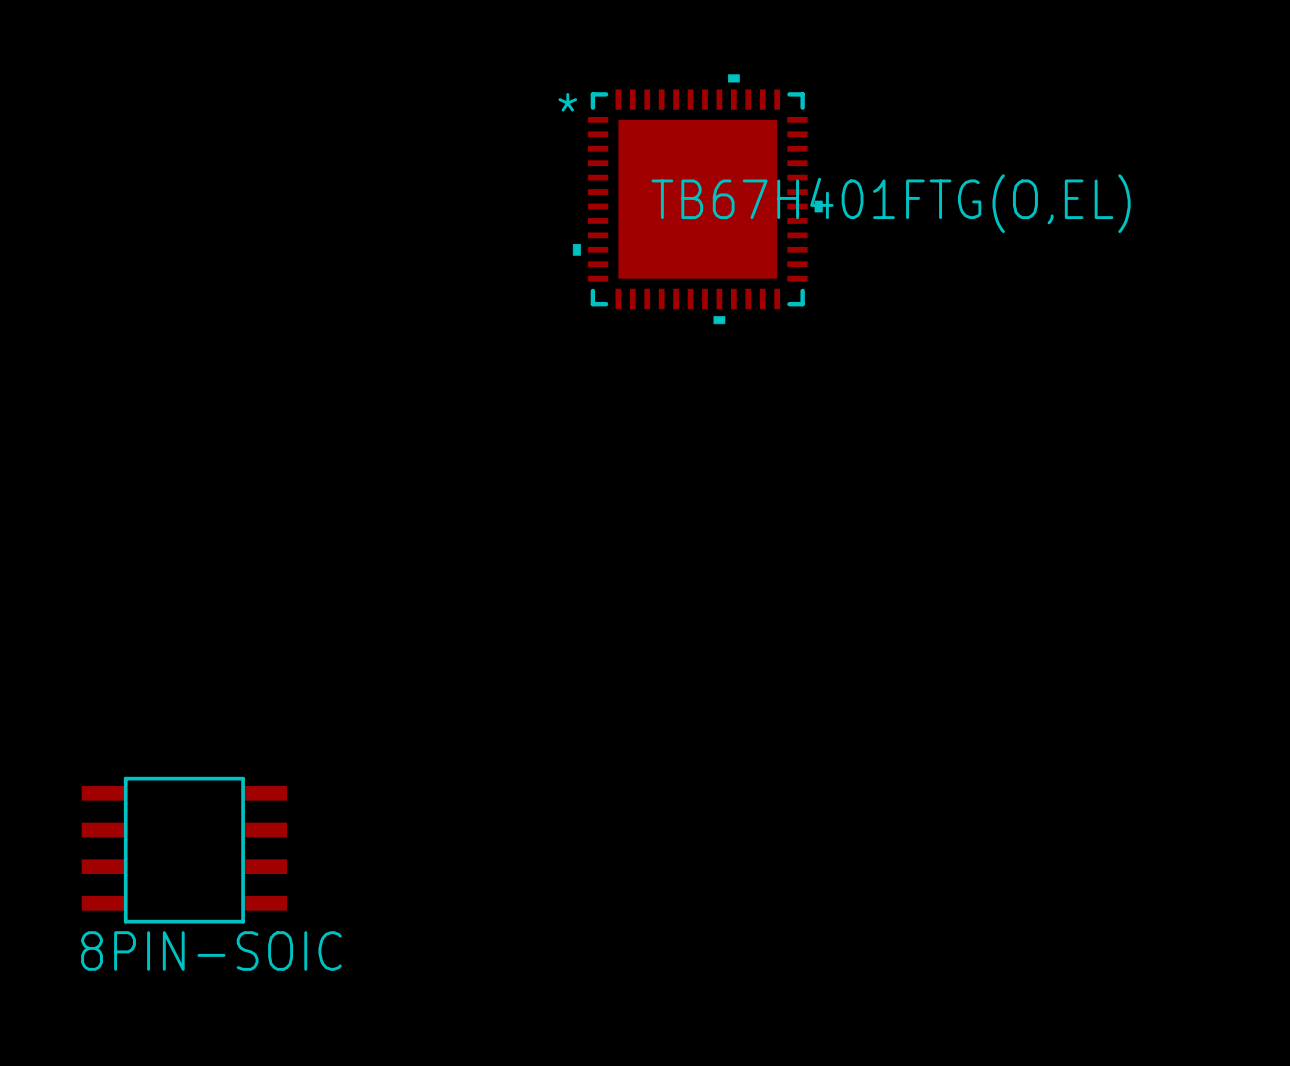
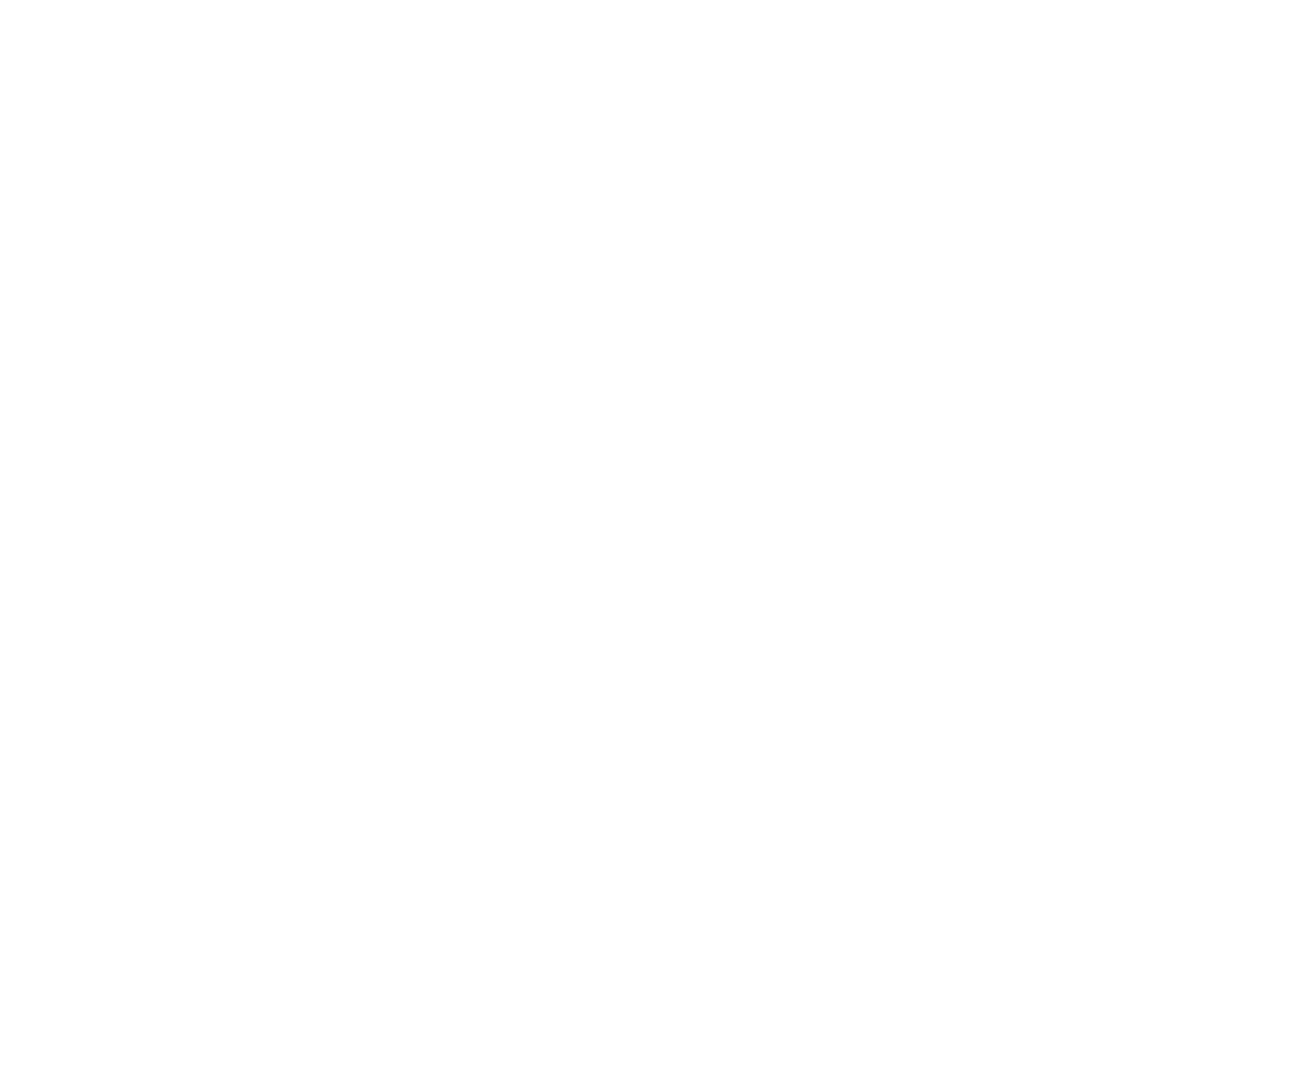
part: TB67H401FTG(O,EL) (697, 199) -> none
part: (184, 850) -> none

